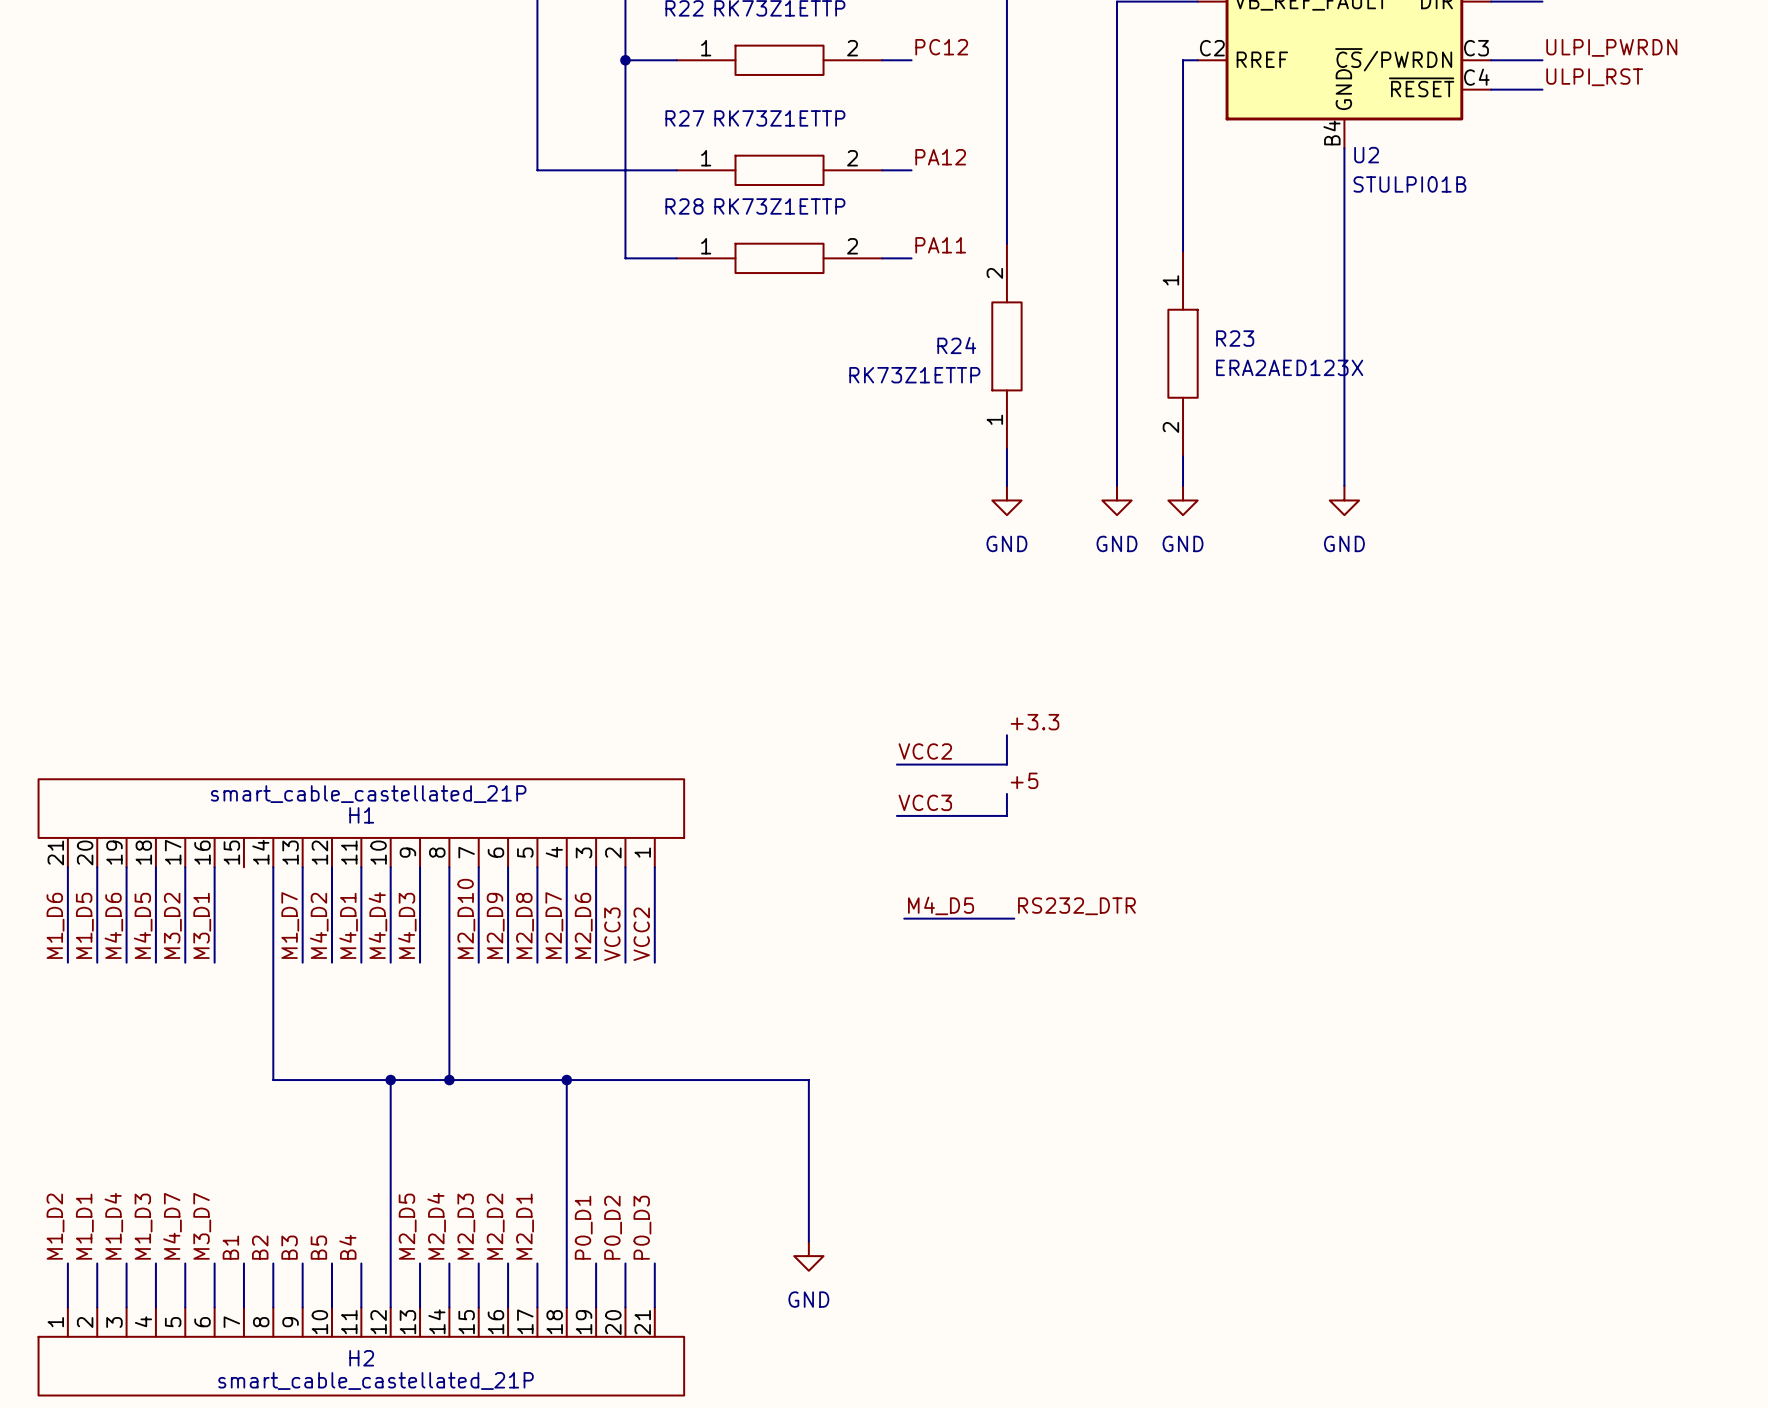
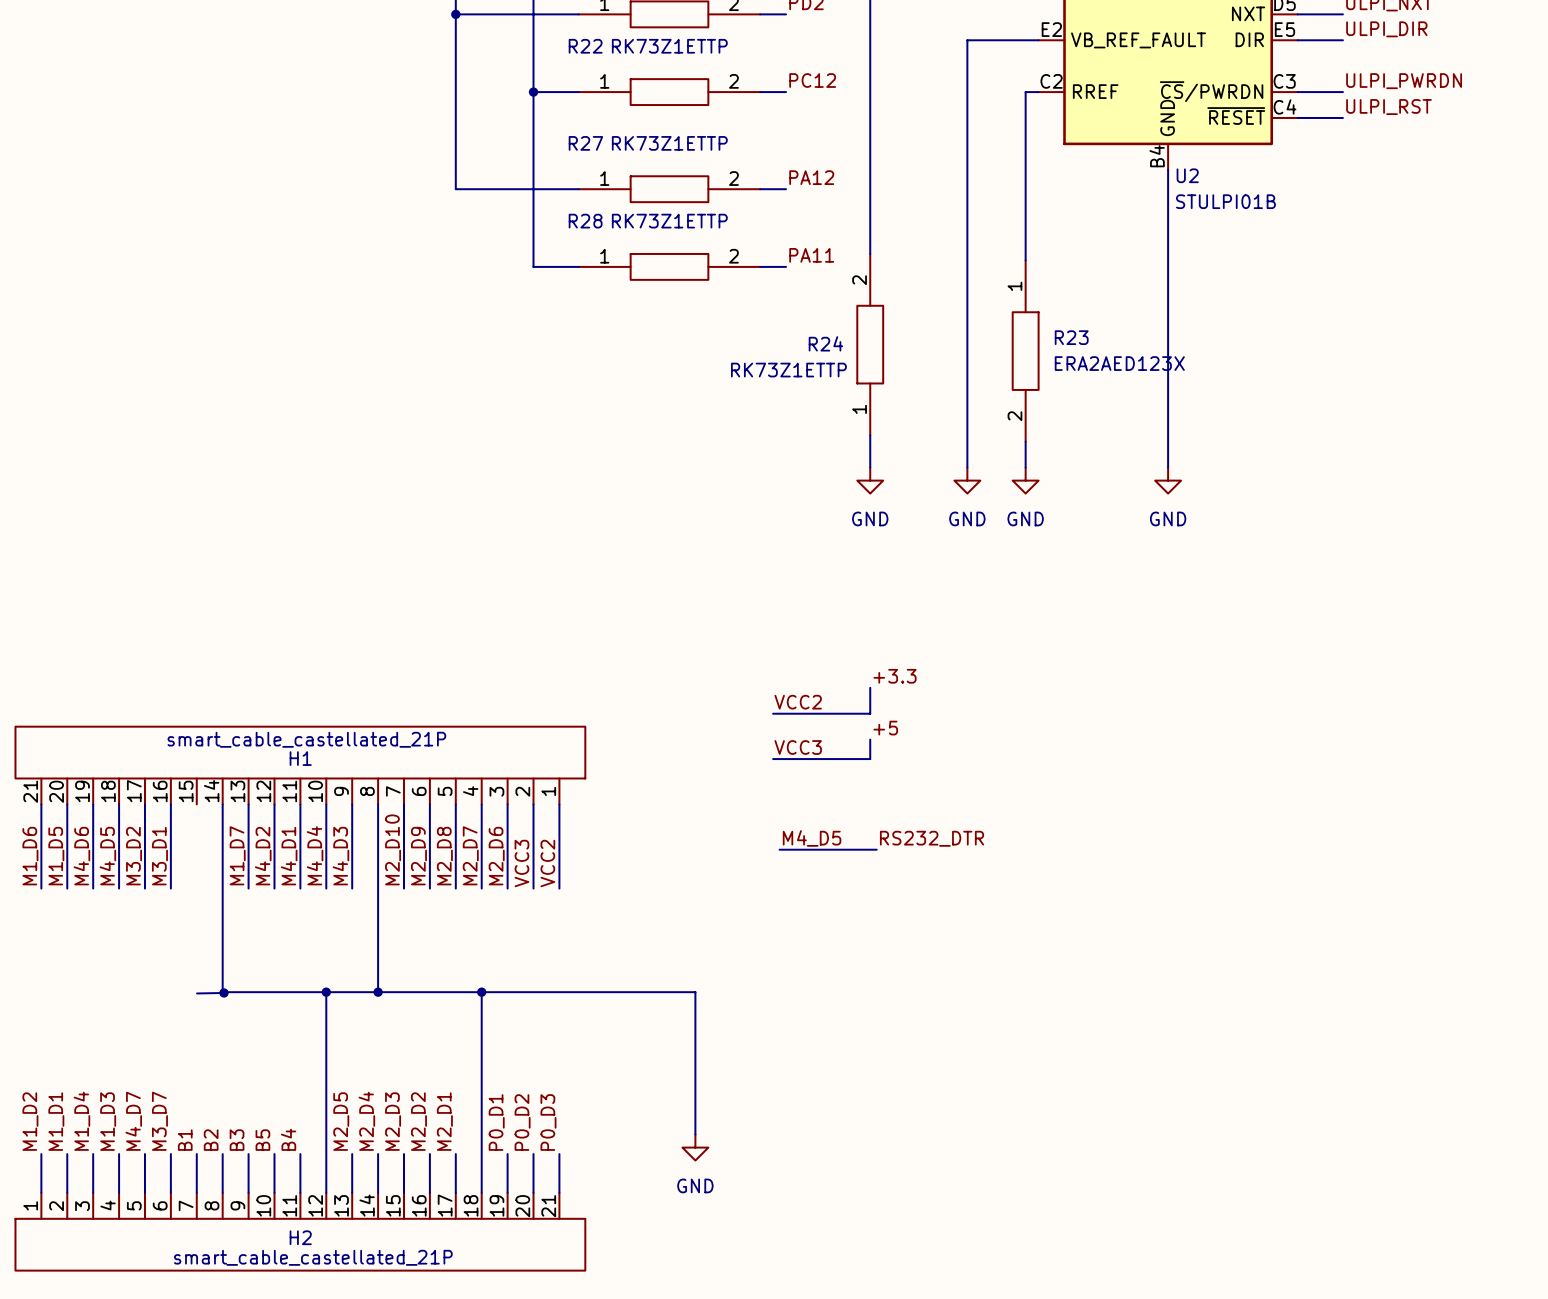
wire: none -> (223, 992) (197, 993)
junction: none -> (223, 992)

